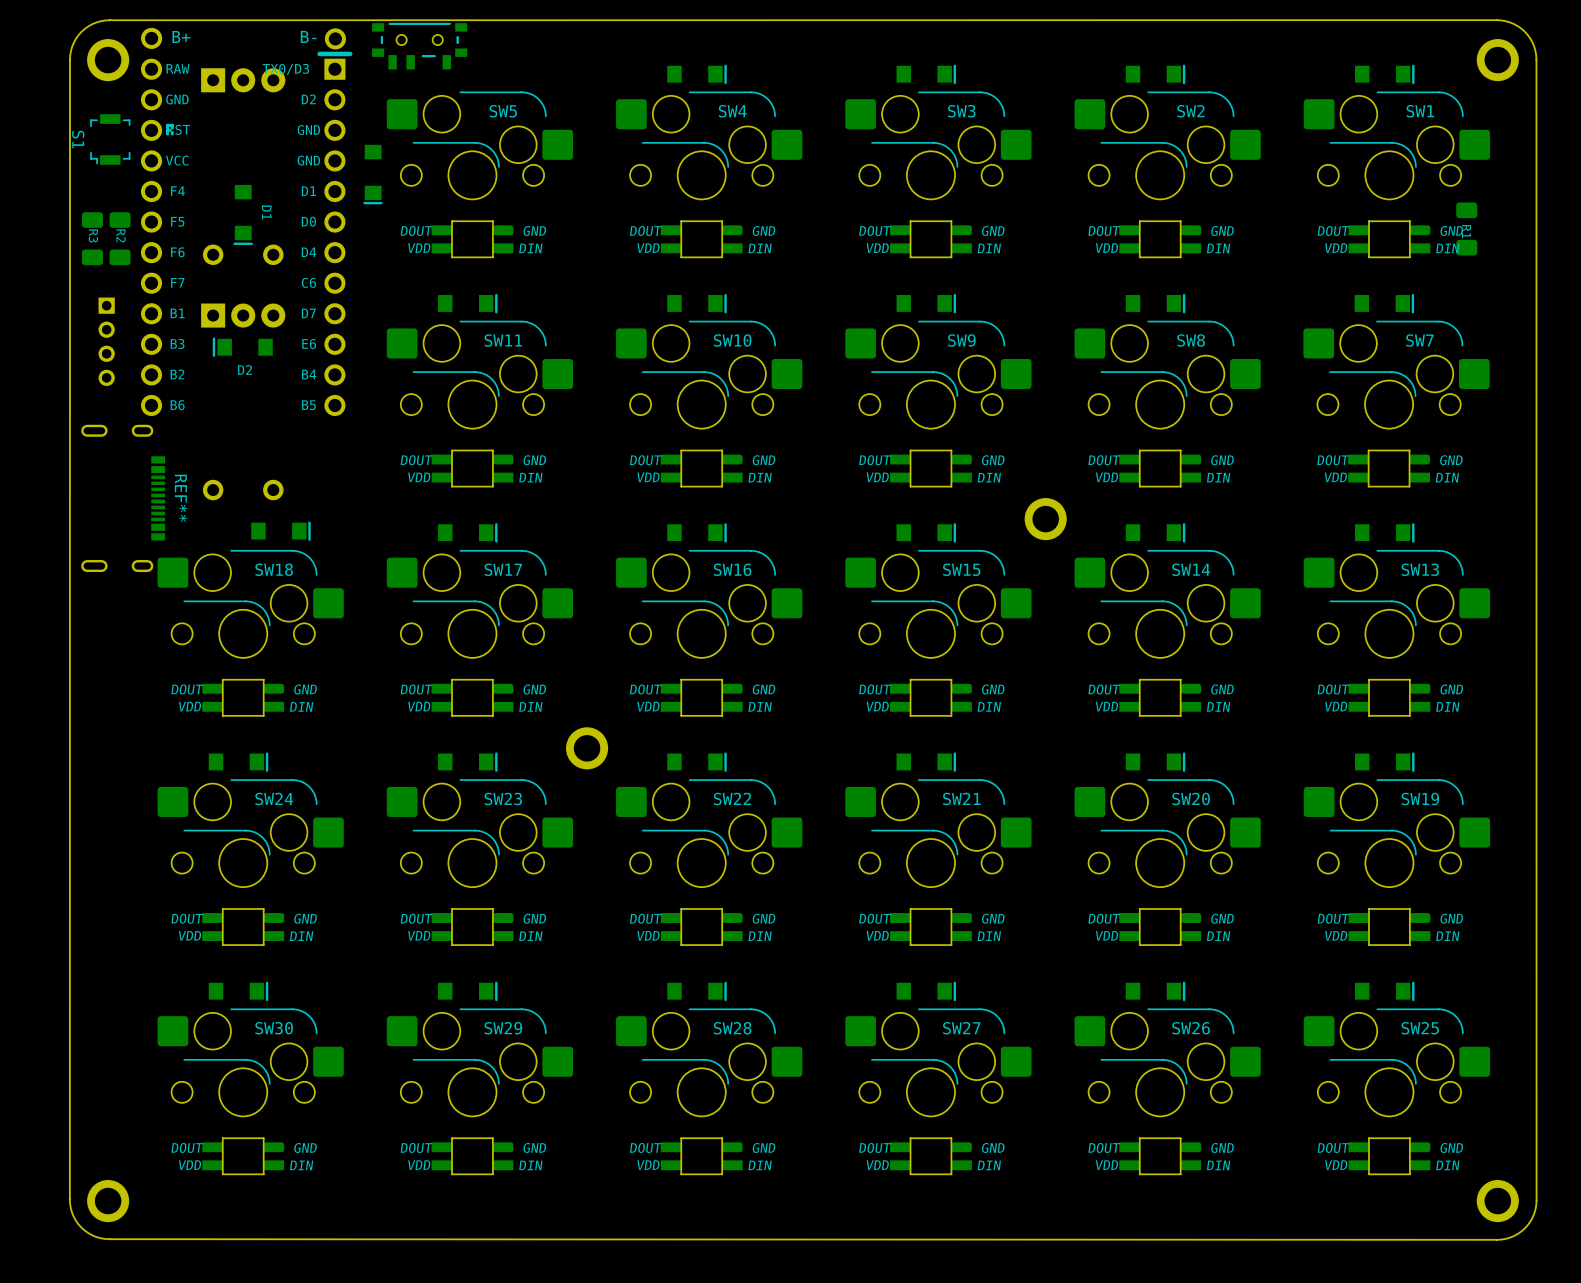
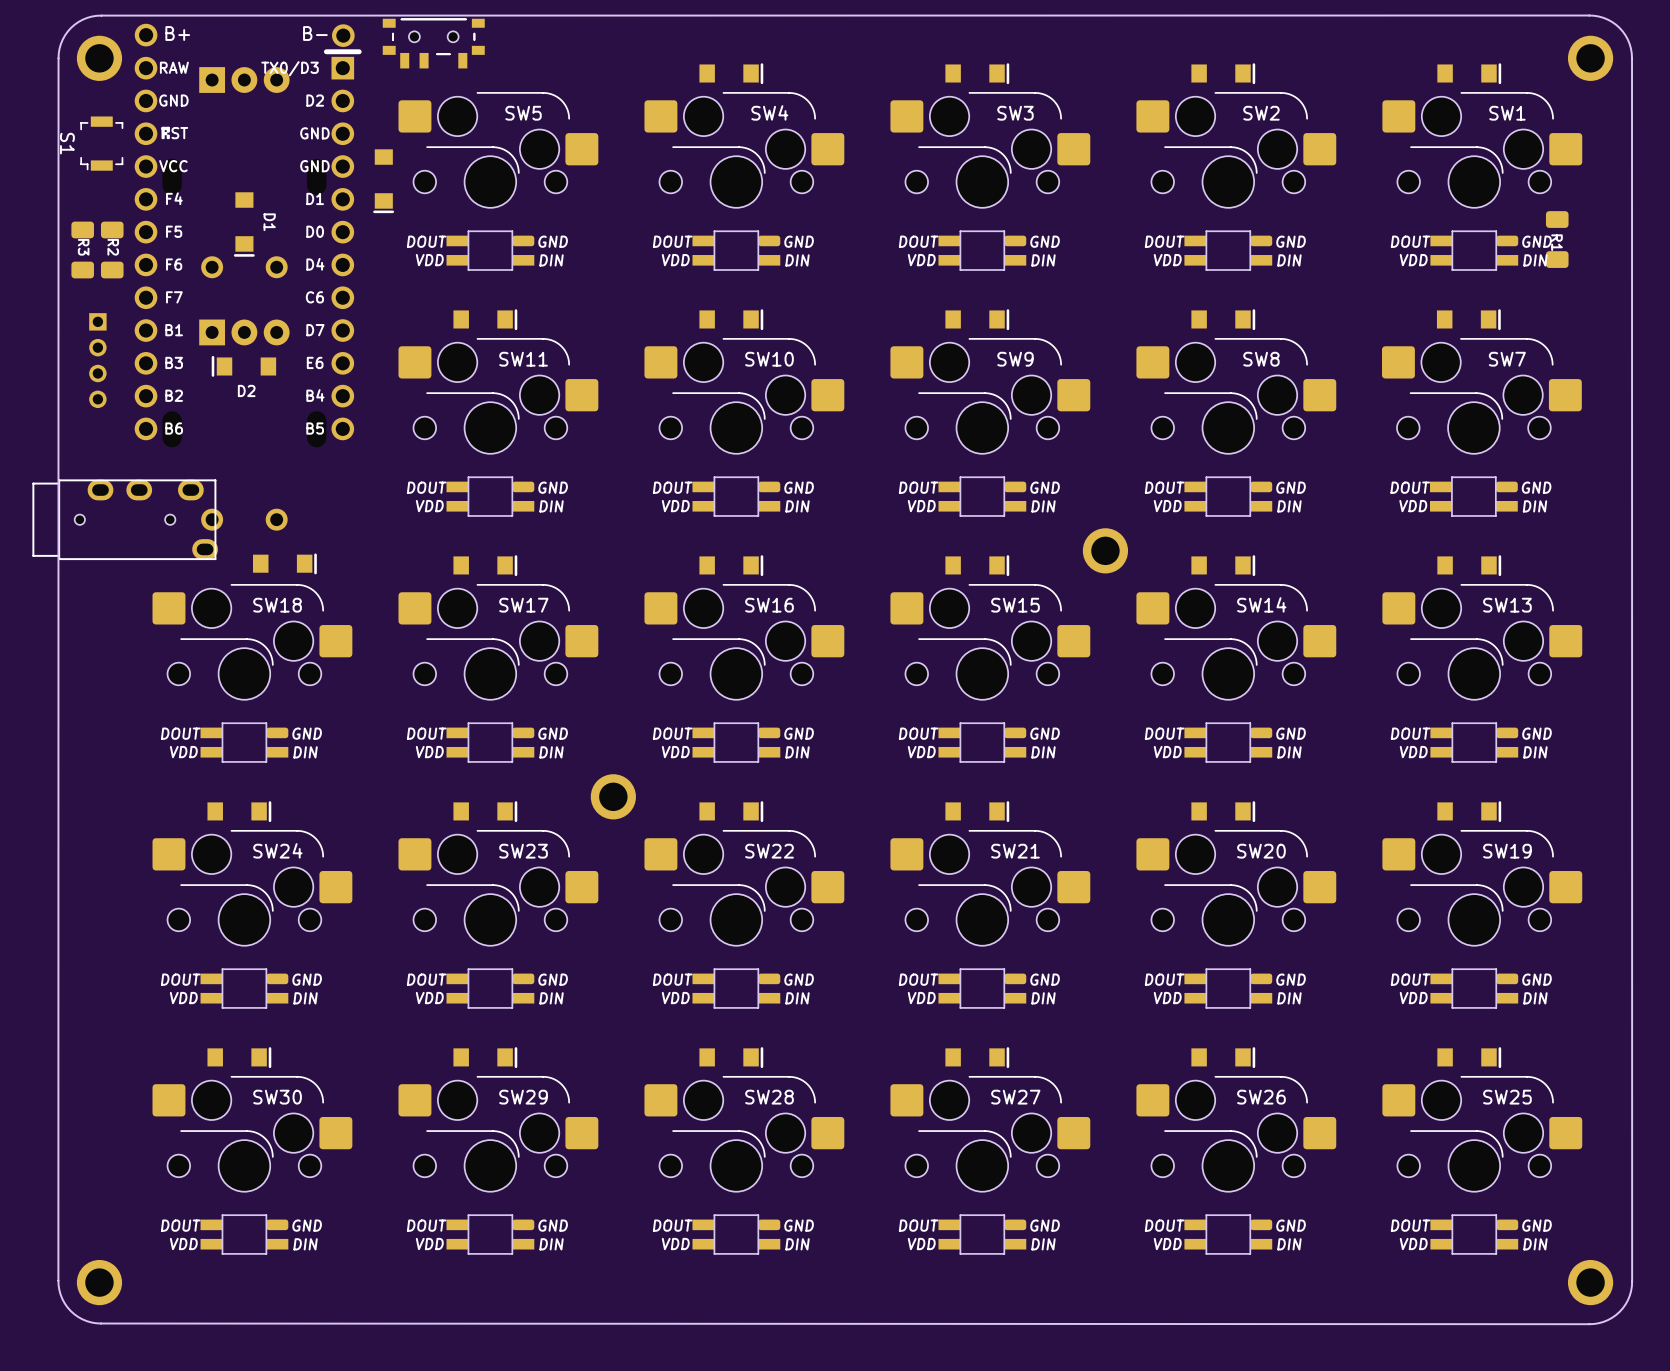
part: none -> (125, 519)
REF**: (123, 498) -> none

